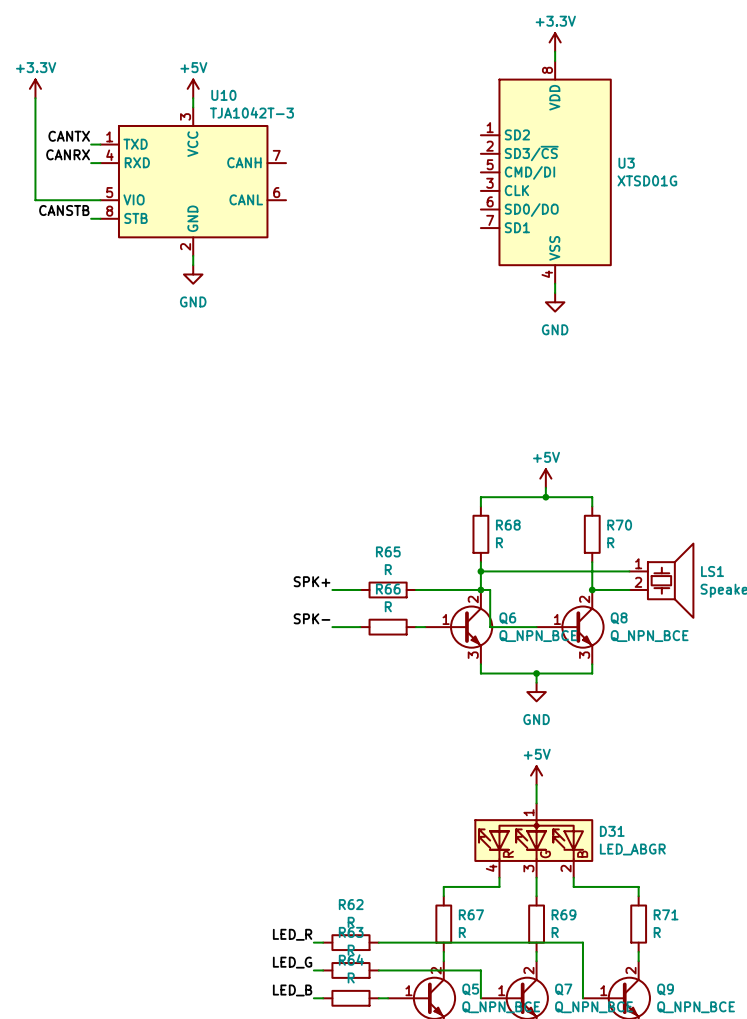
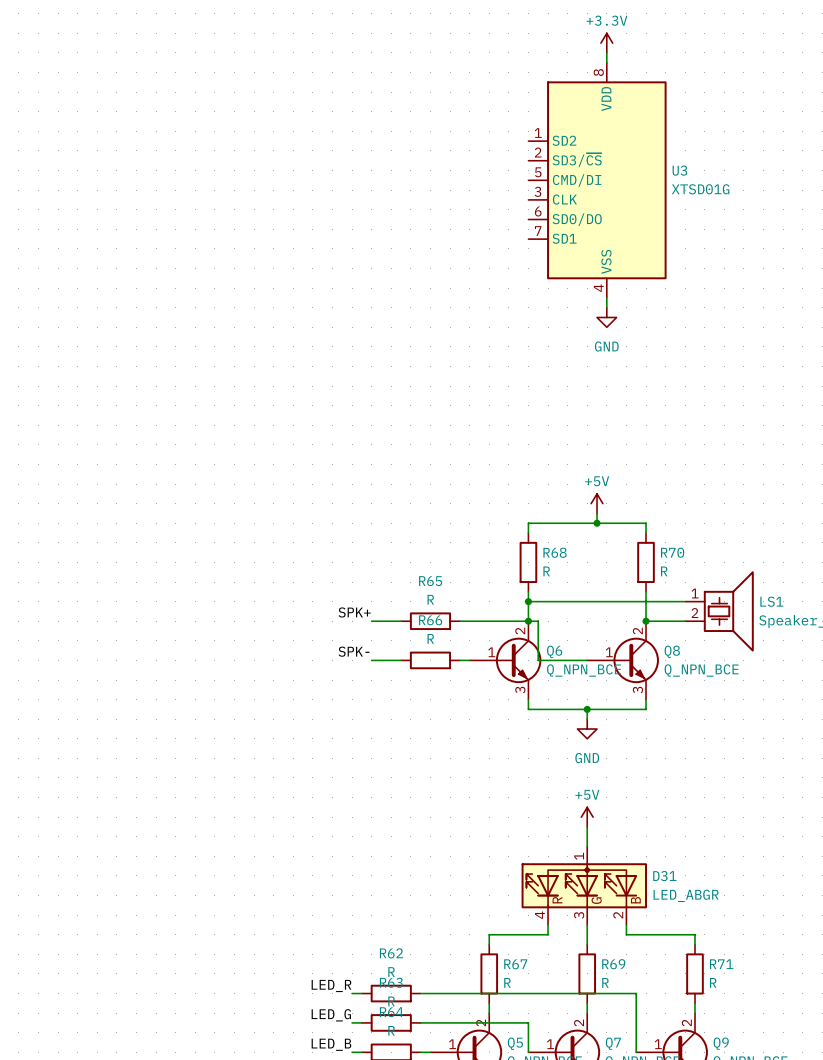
power symbol: +3.3V (35, 88) -> none
power symbol: +5V (193, 88) -> none
wire: (35, 98) (35, 200) (100, 200) -> none
wire: (193, 98) (193, 107) -> none
label: CANTX (69, 136) -> none
wire: (91, 144) (100, 144) -> none
label: CANRX (68, 154) -> none
wire: (91, 163) (100, 163) -> none
U10: TJA1042T-3 (193, 181) -> none
label: CANSTB (64, 210) -> none
wire: (91, 218) (100, 218) -> none
wire: (193, 255) (193, 265) -> none
power symbol: GND (193, 274) -> none

